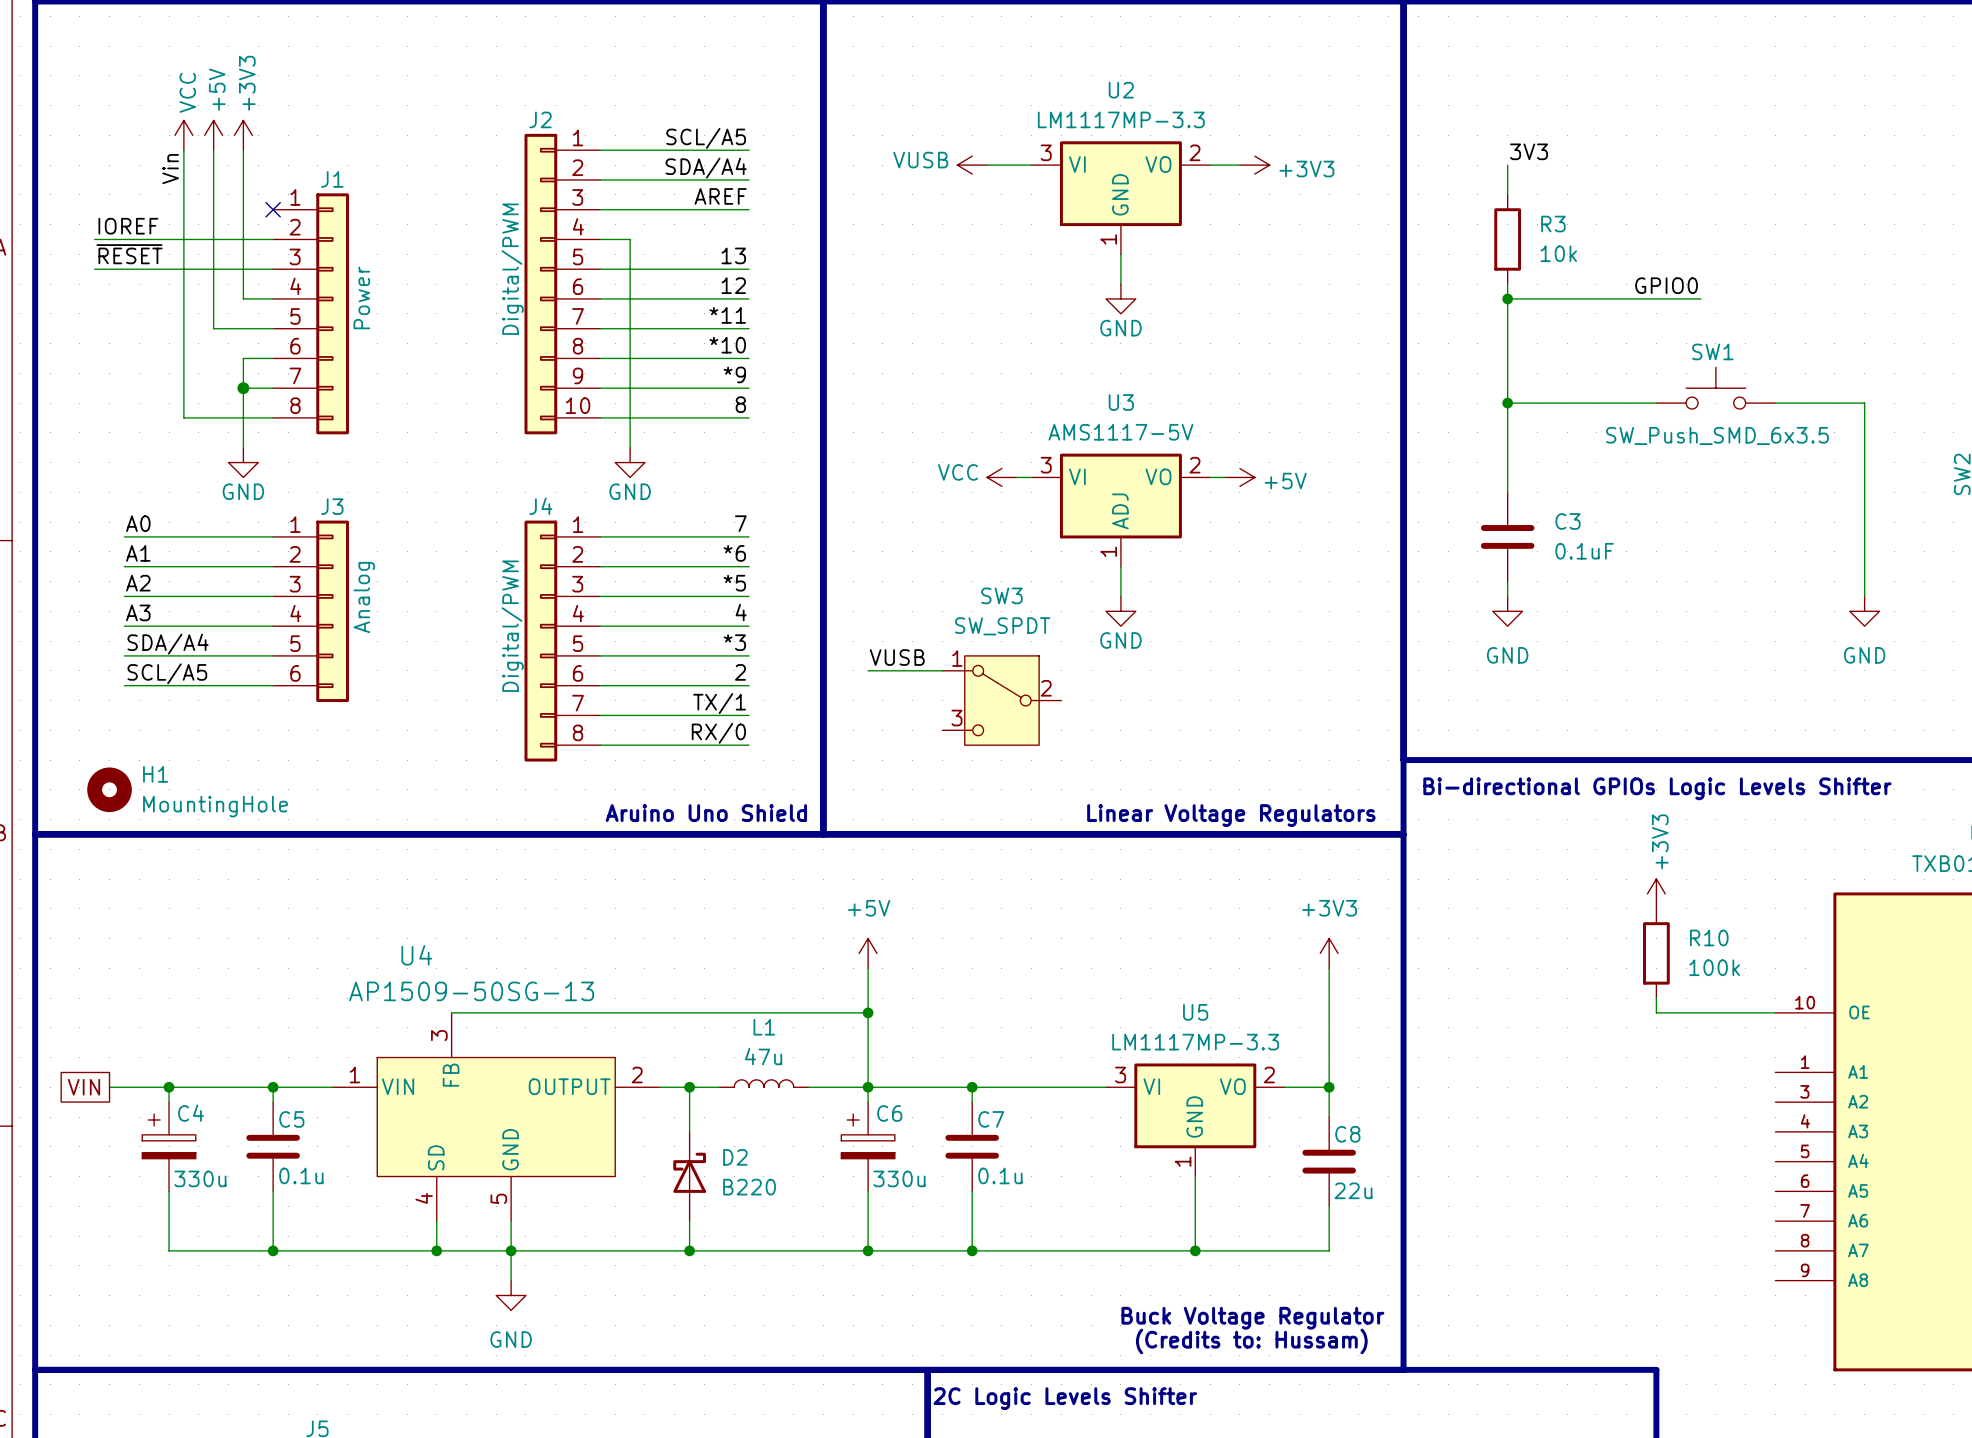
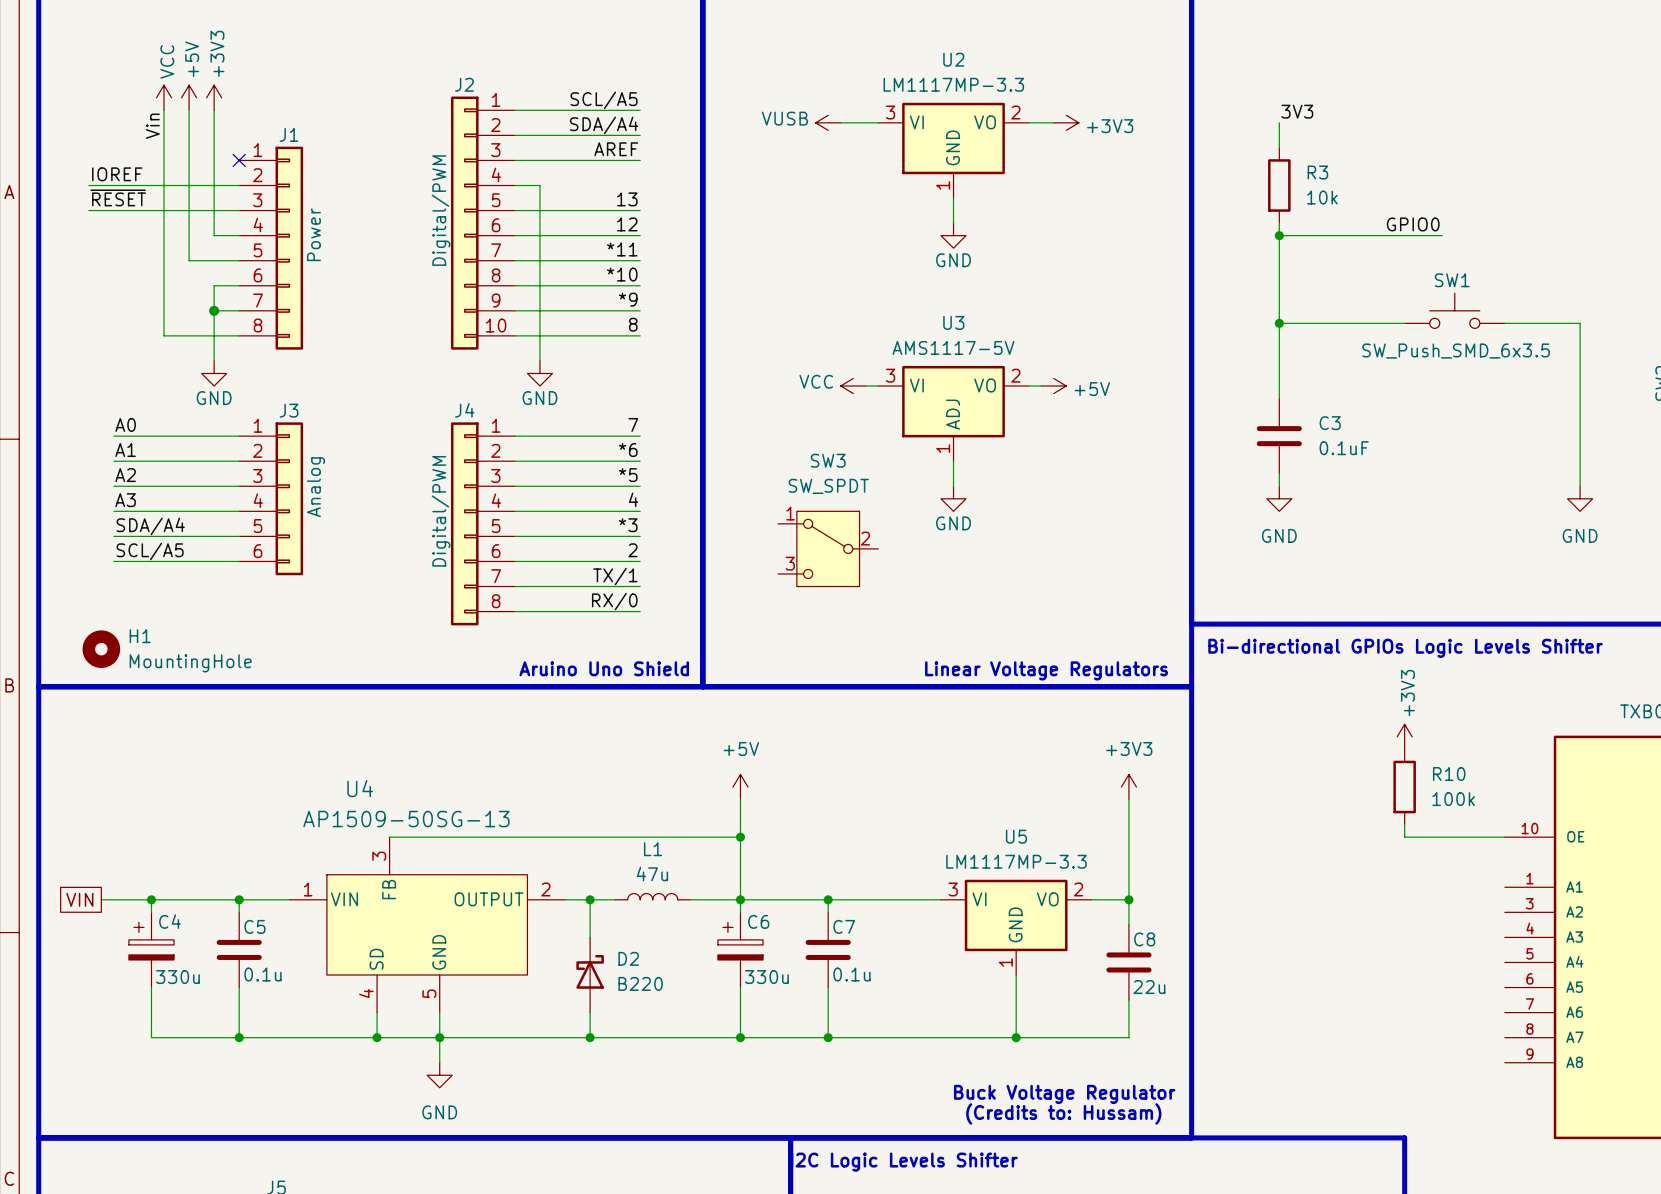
label: VUSB (897, 657) -> none
wire: (868, 670) (942, 670) -> none
SW3 position: (1001, 700) -> (828, 548)

